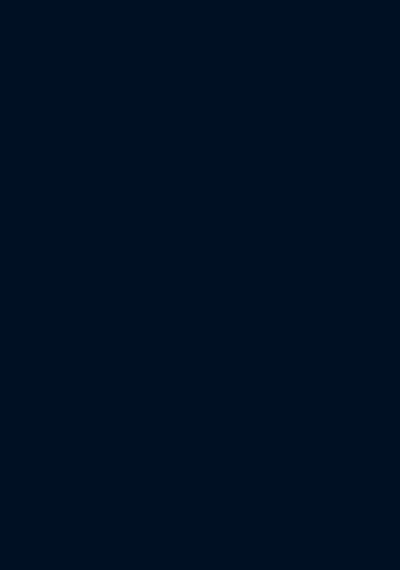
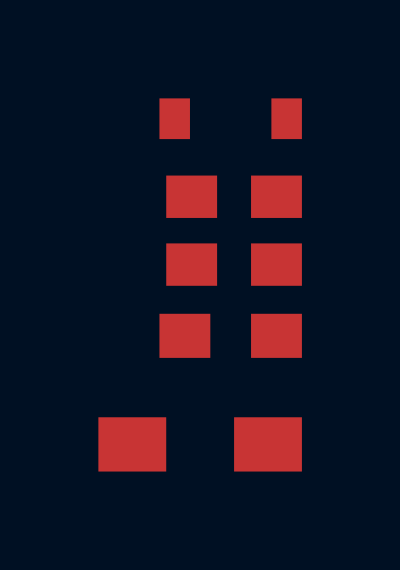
part: none -> (230, 118)
part: none -> (234, 196)
part: none -> (234, 264)
part: none -> (230, 335)
part: none -> (200, 444)

